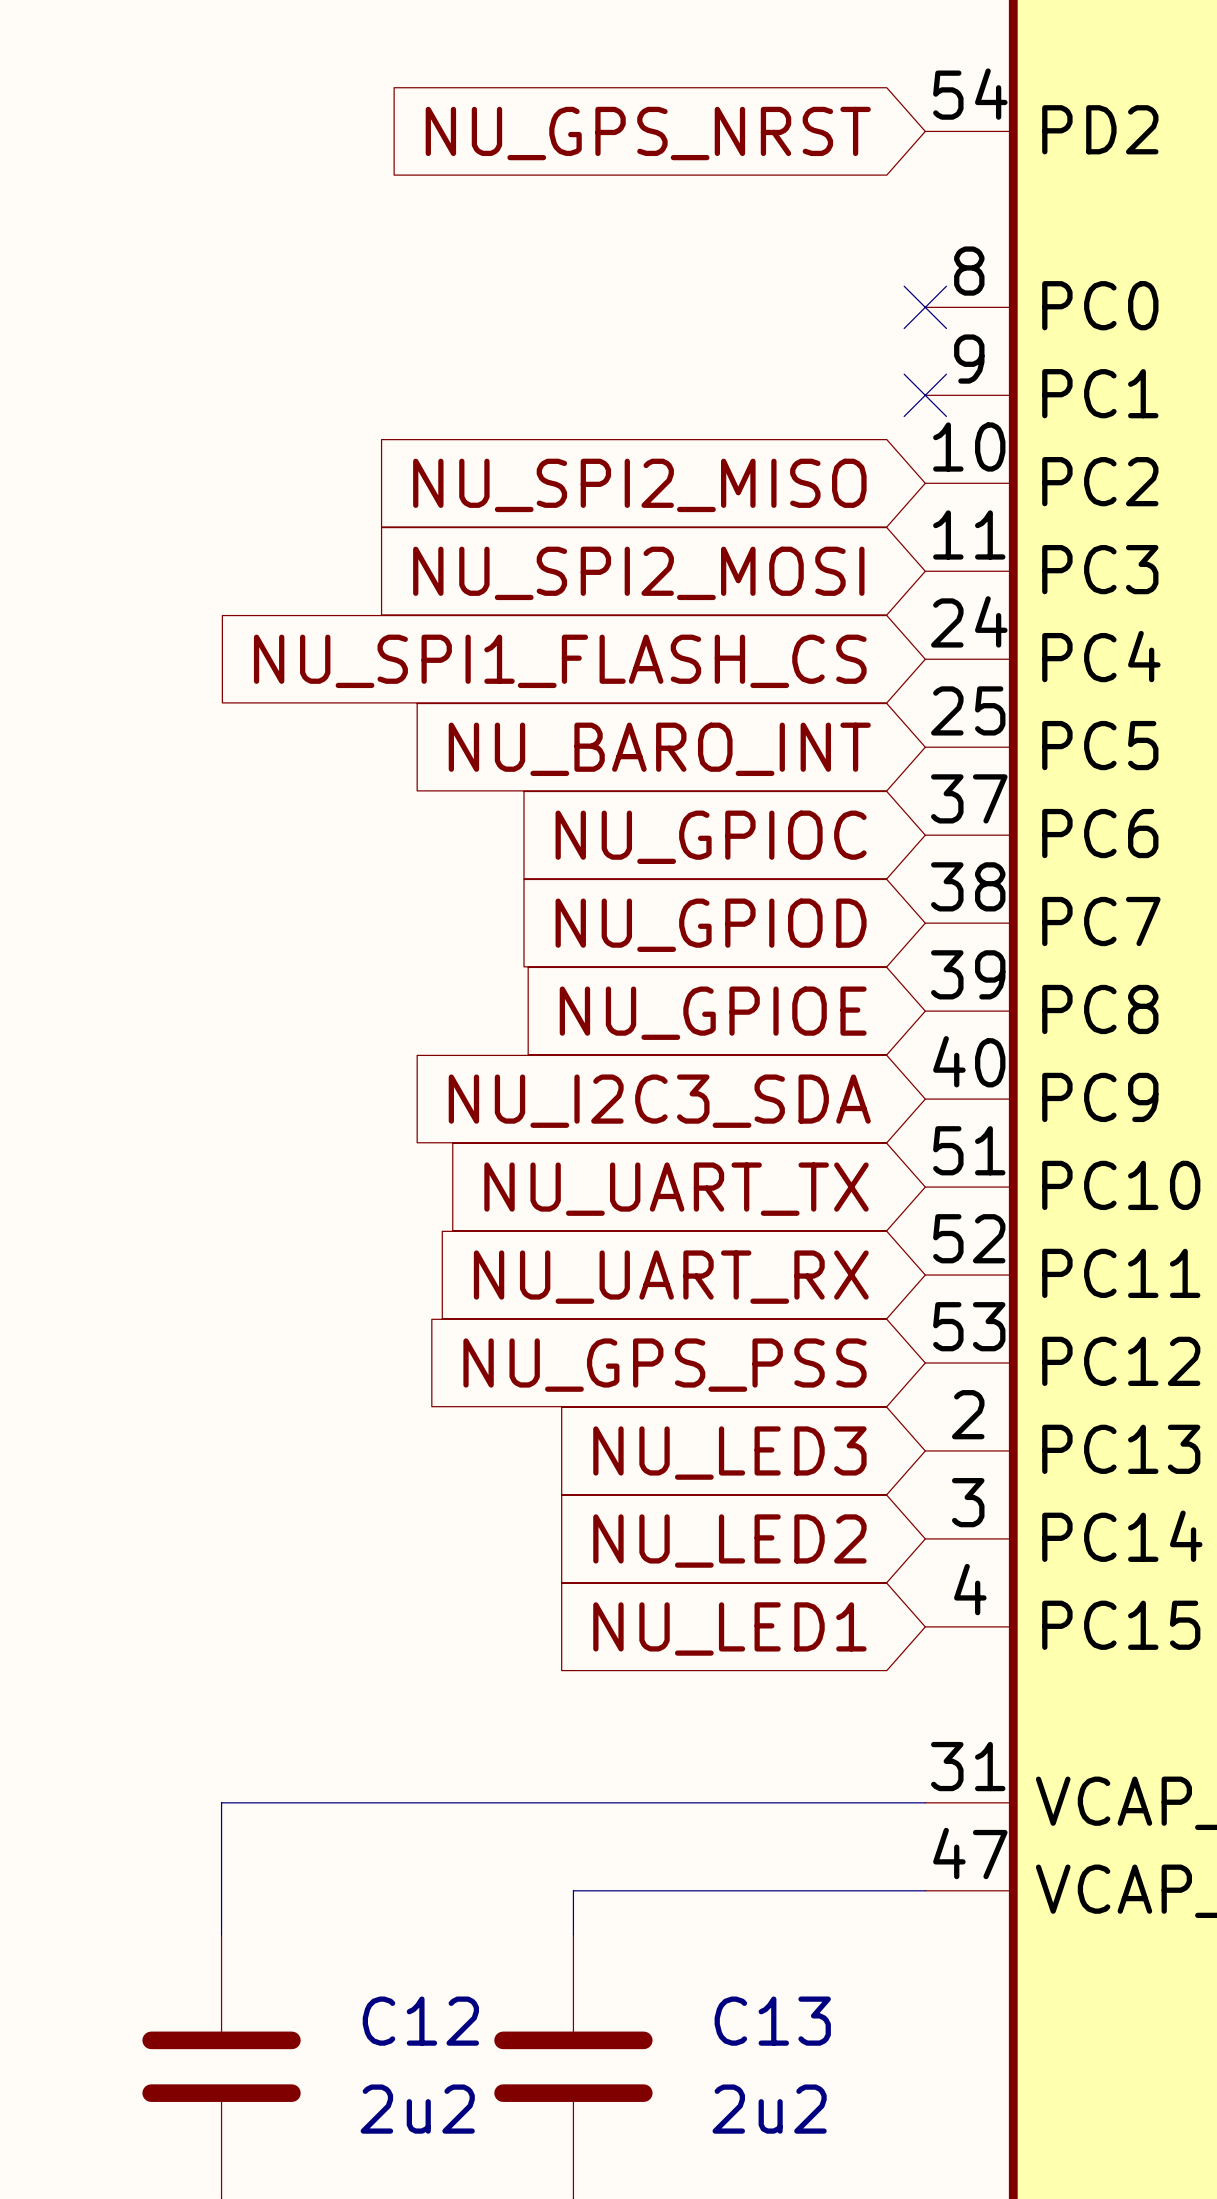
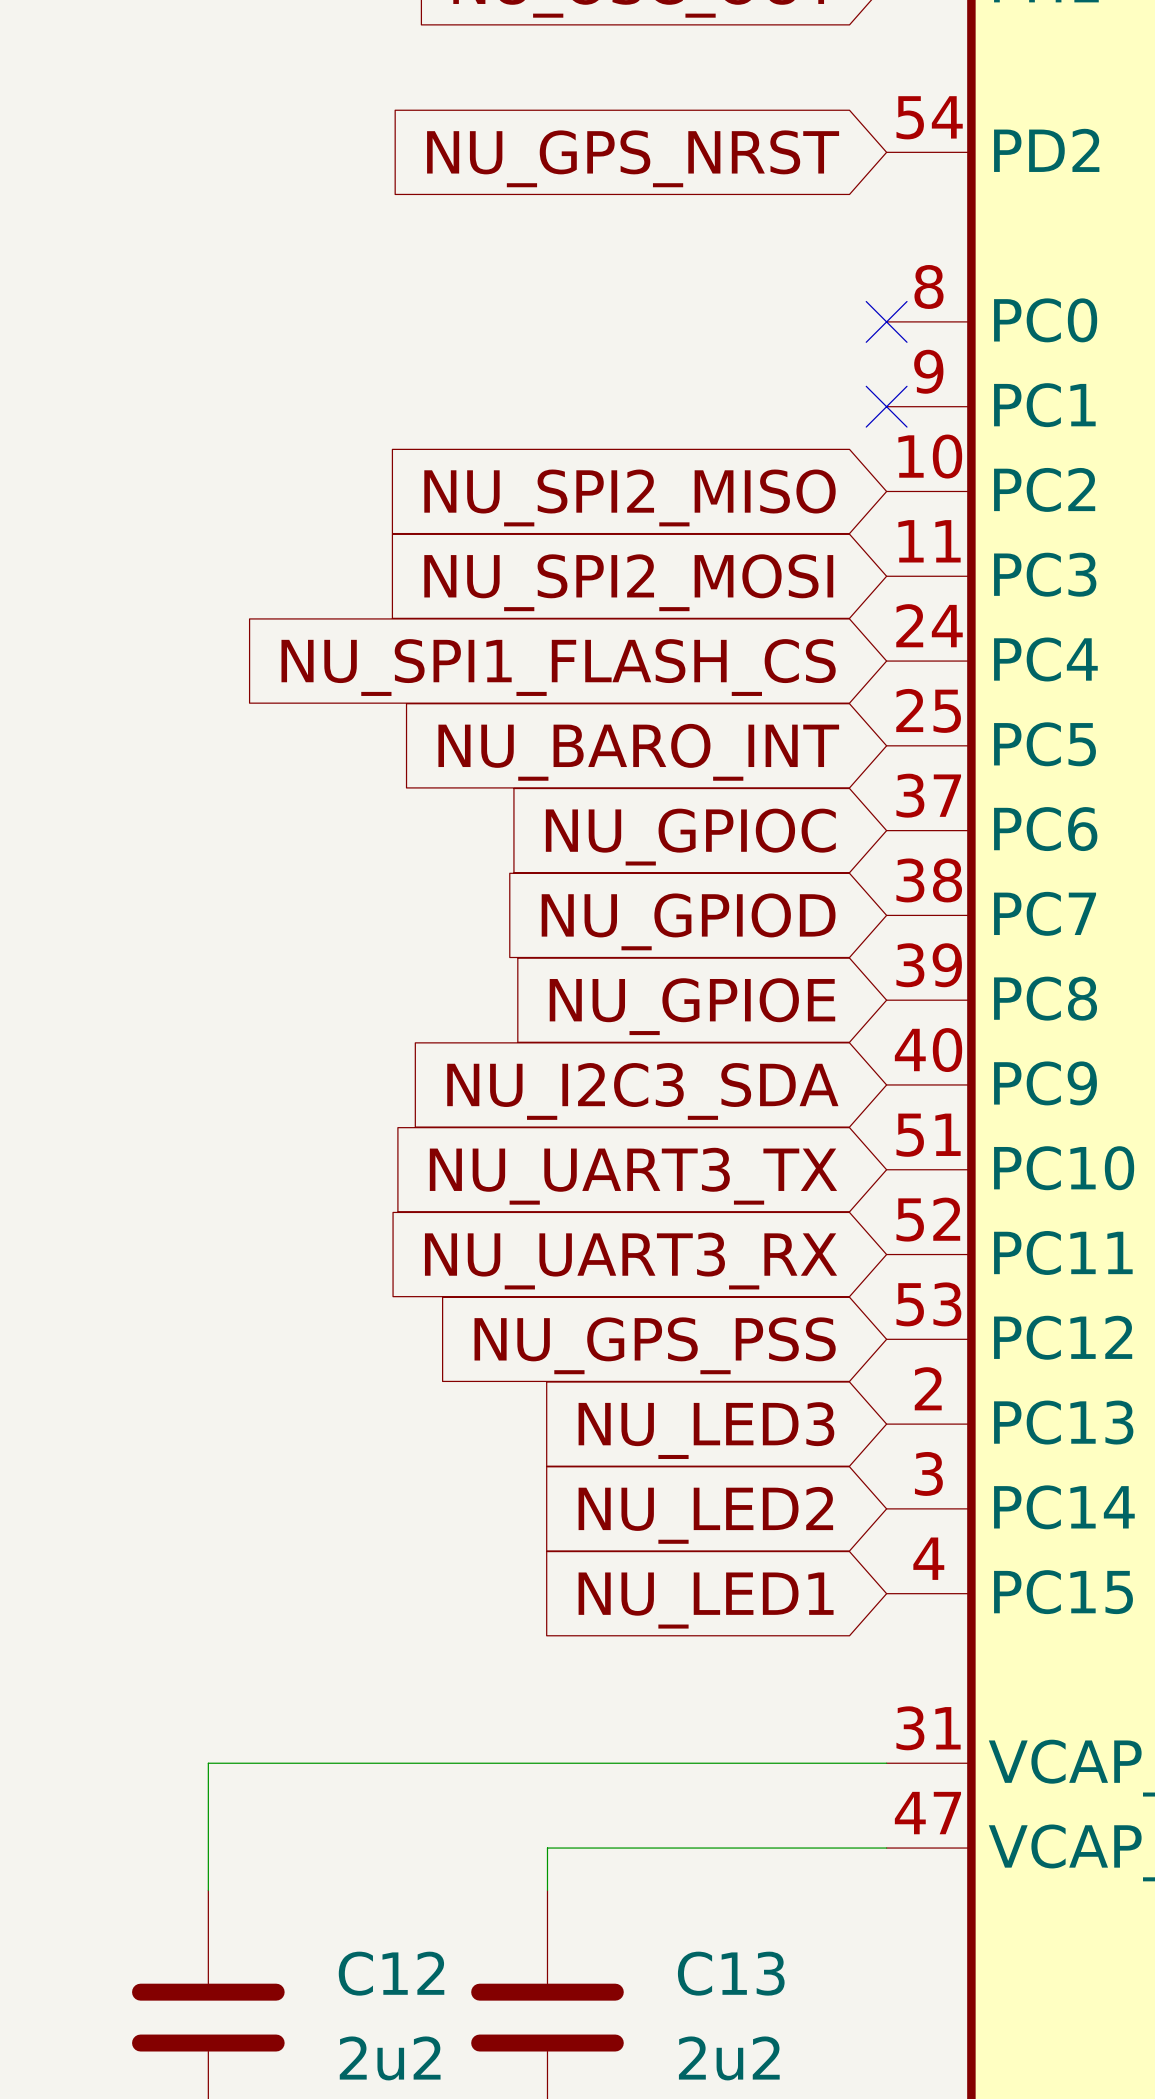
global label: NU_UART_TX (676, 1189) -> NU_UART3_TX (633, 1176)
global label: NU_UART_RX (671, 1277) -> NU_UART3_RX (631, 1261)

